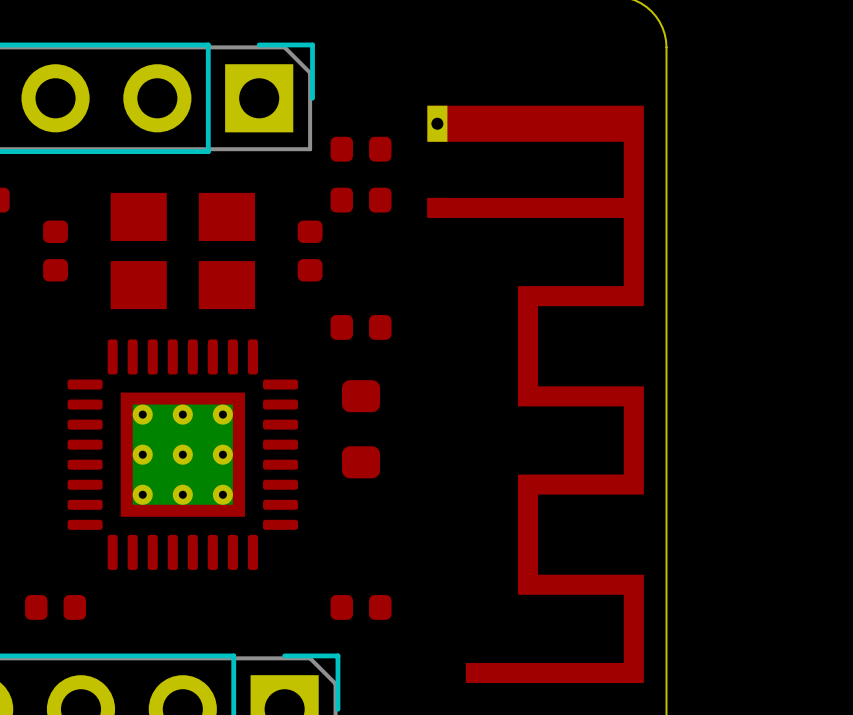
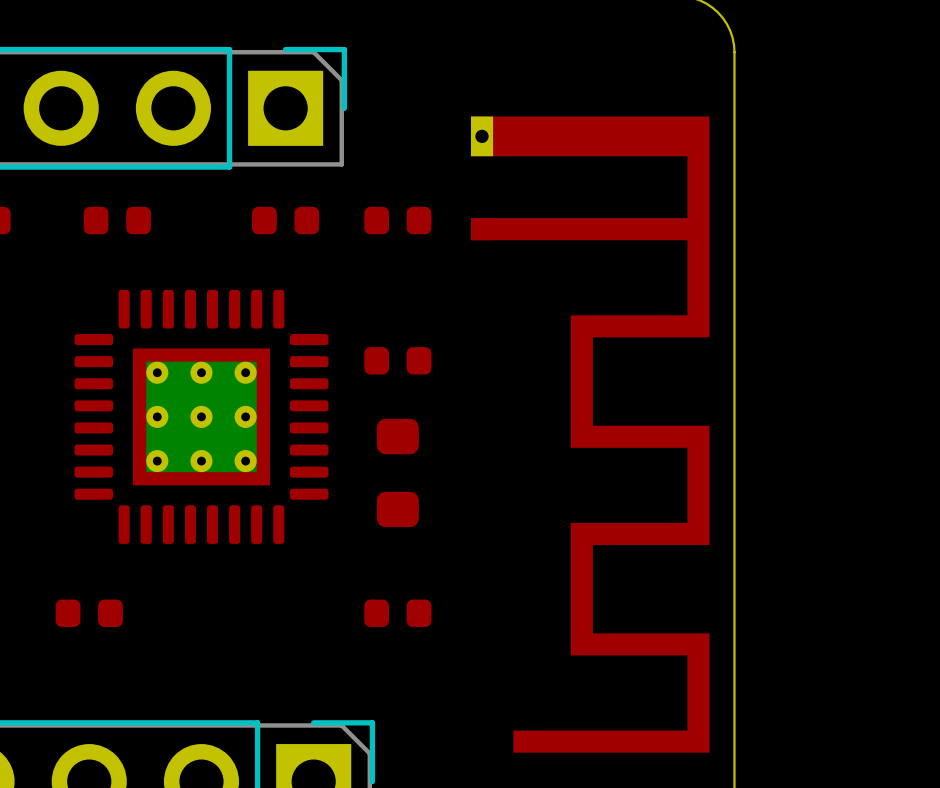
part: (361, 149) -> none
part: none -> (285, 220)
part rotation: 0° (55, 251) -> 90° clockwise (117, 220)
part position: (55, 251) -> (117, 220)
part: (182, 251) -> none
part: (310, 251) -> none
part position: (182, 454) -> (201, 416)
part position: (55, 607) -> (89, 613)
part position: (361, 607) -> (397, 613)

